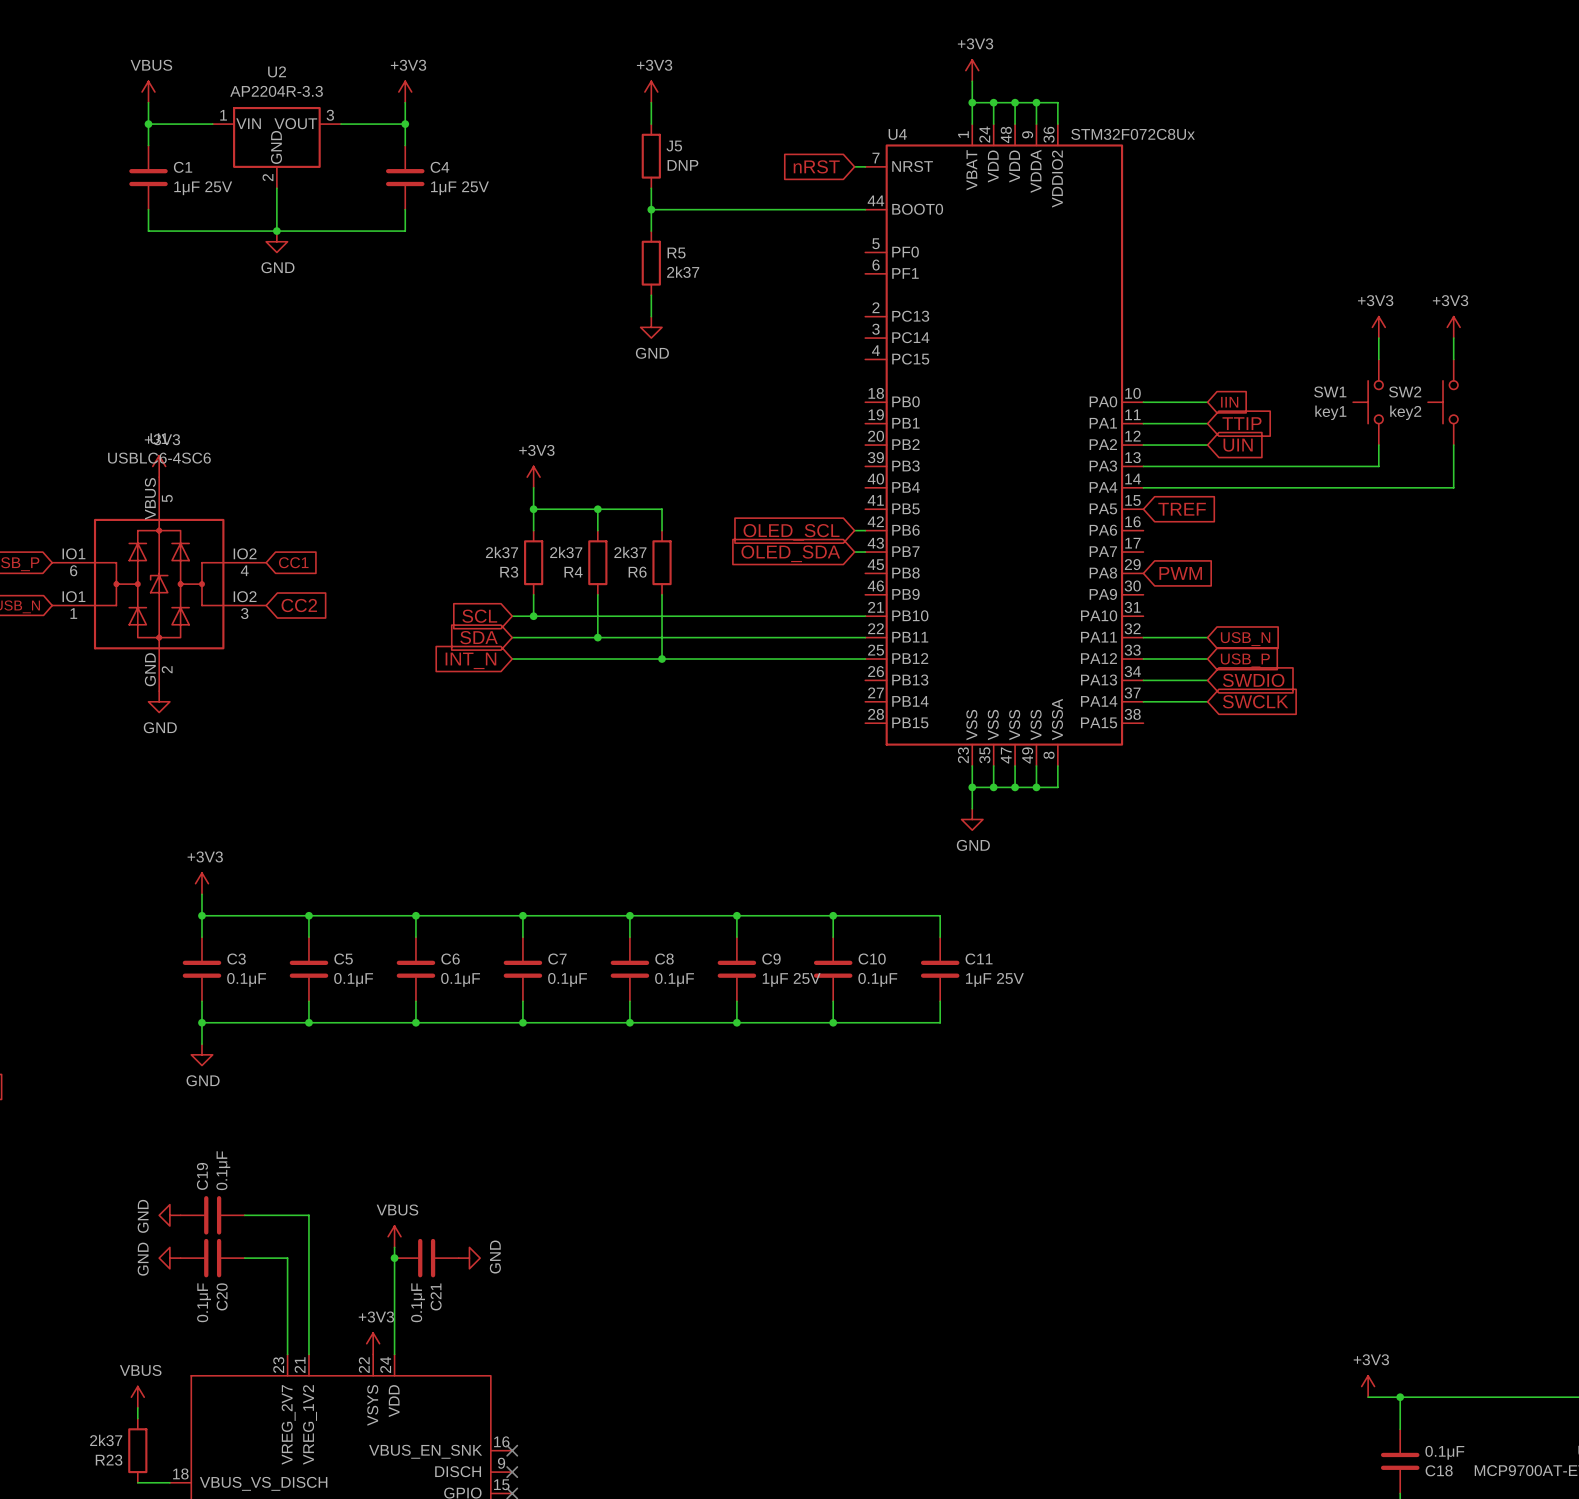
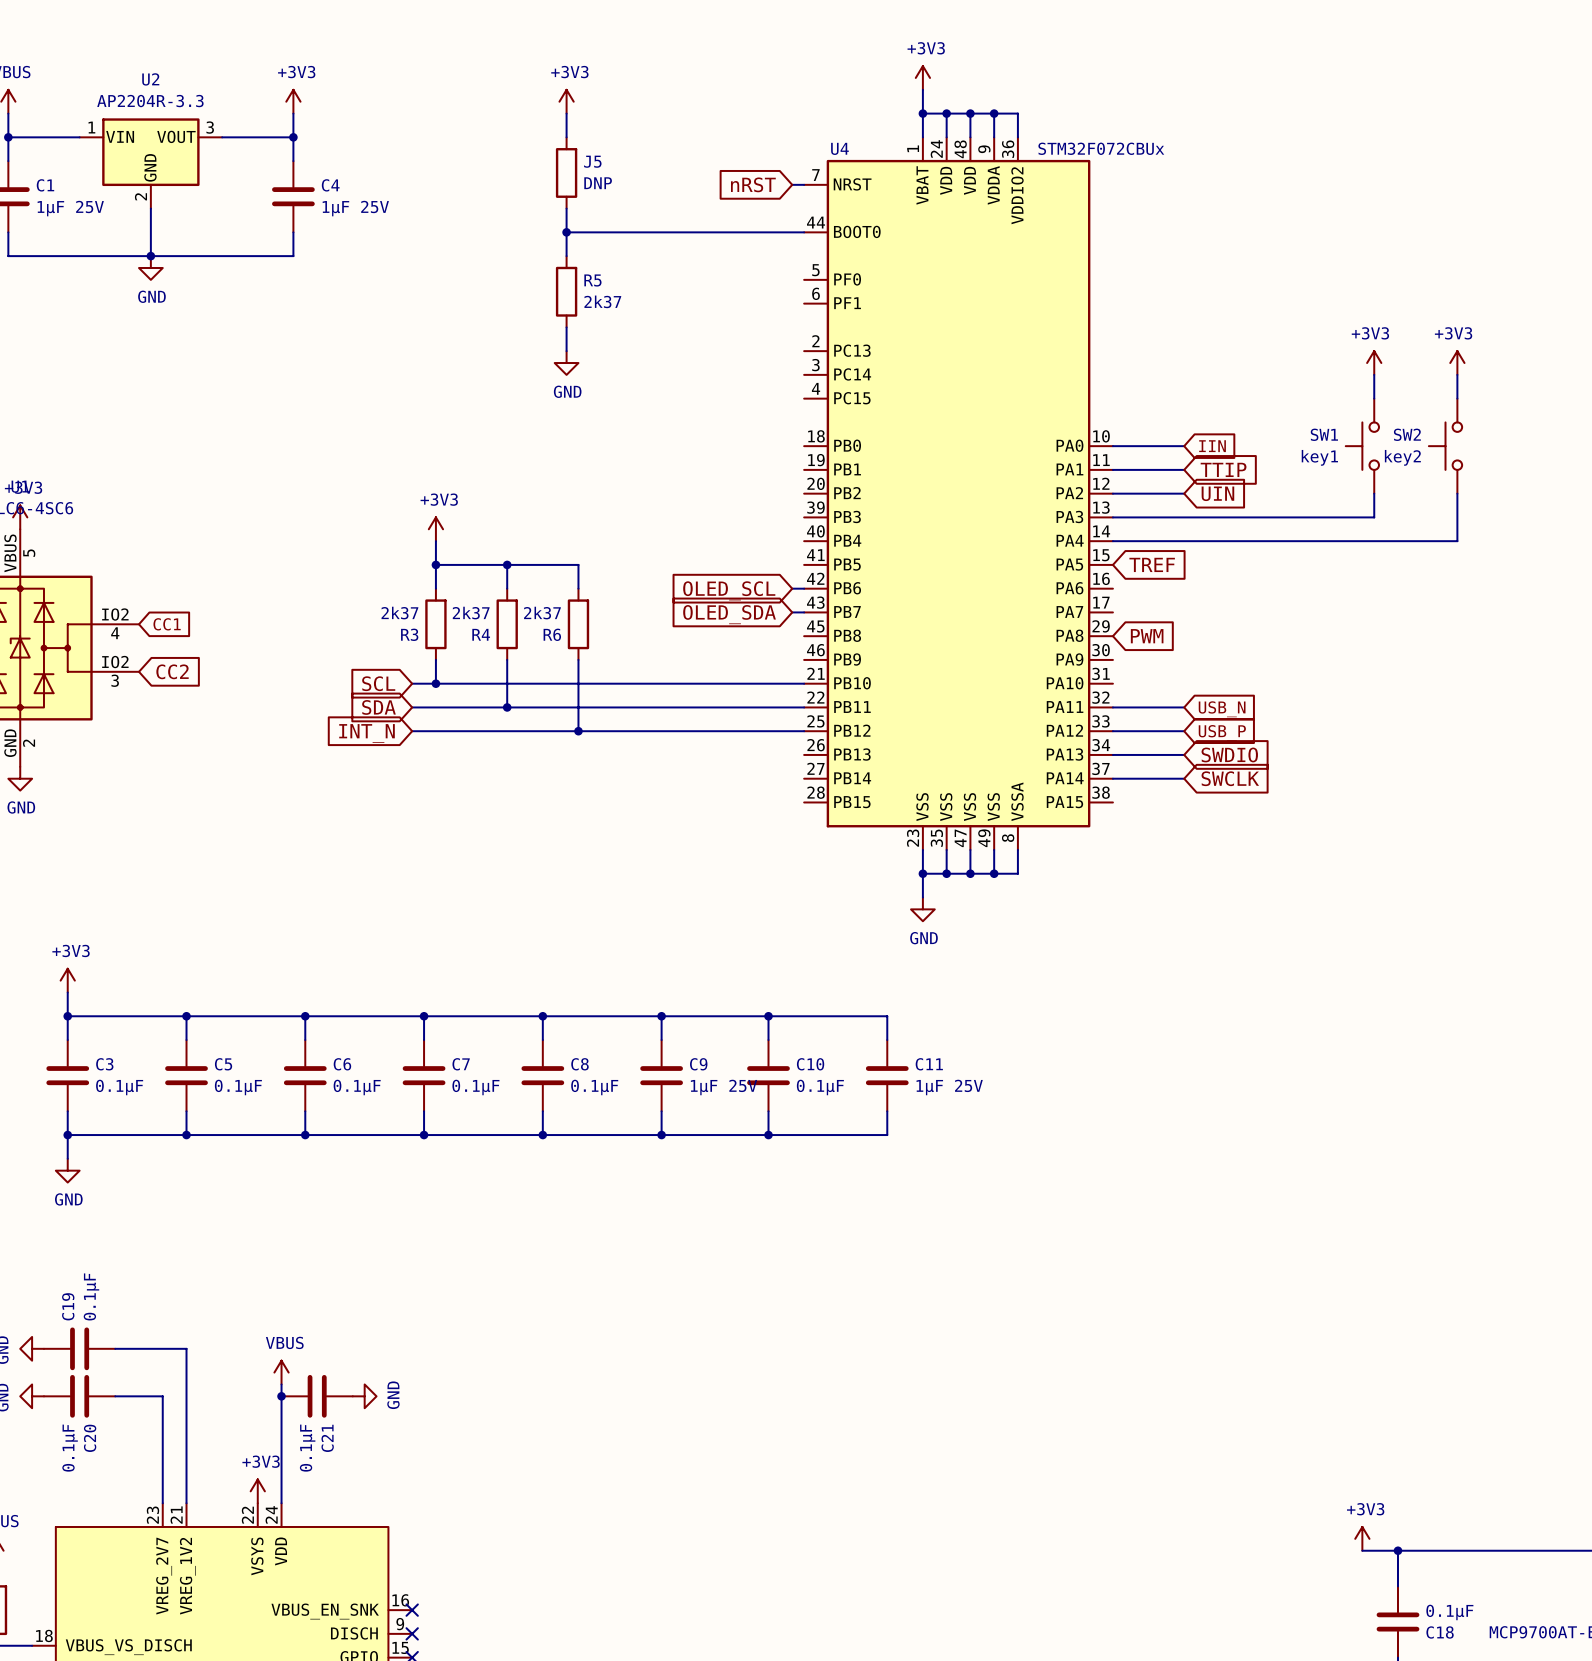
U4 value: STM32F072C8Ux (1133, 134) -> STM32F072CBUx (1101, 148)

